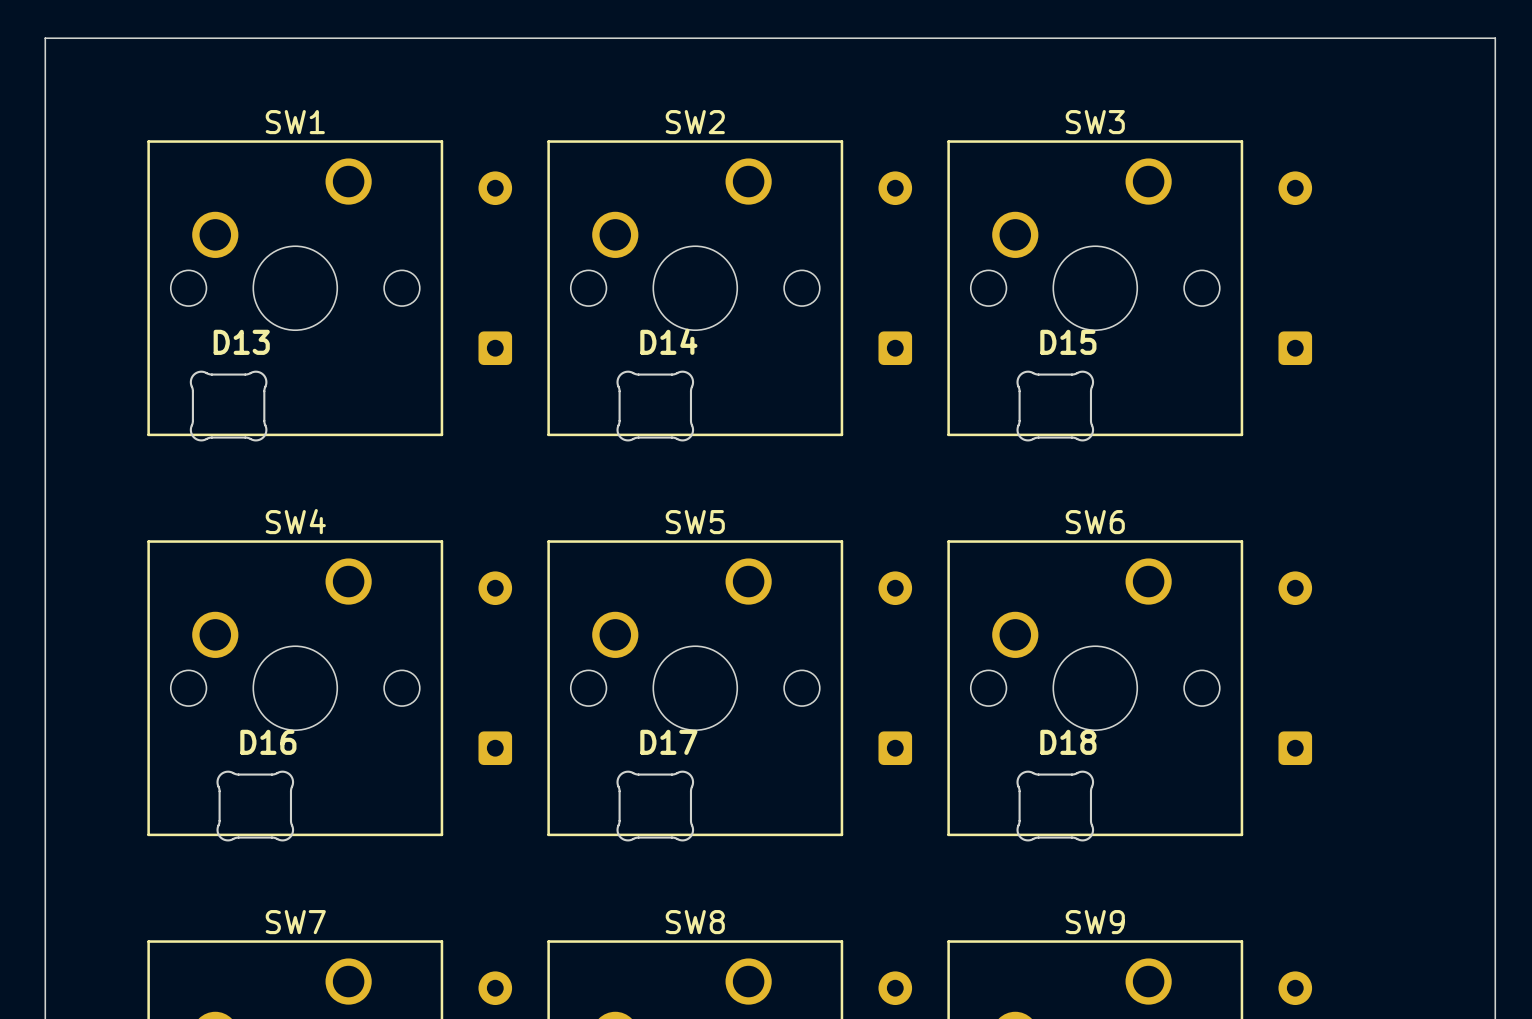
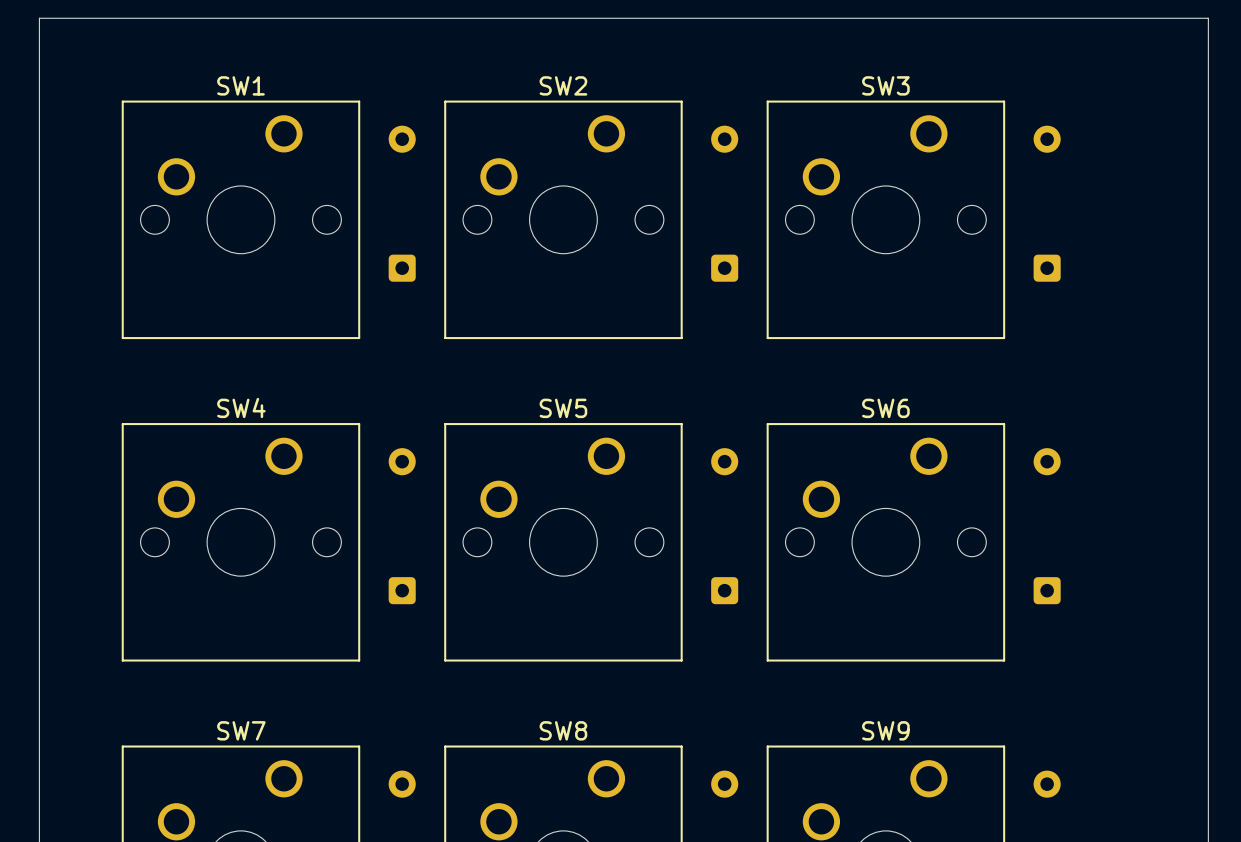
D13: (228, 406) -> none
D14: (655, 406) -> none
D15: (1055, 406) -> none
D16: (255, 806) -> none
D17: (655, 806) -> none
D18: (1055, 806) -> none

